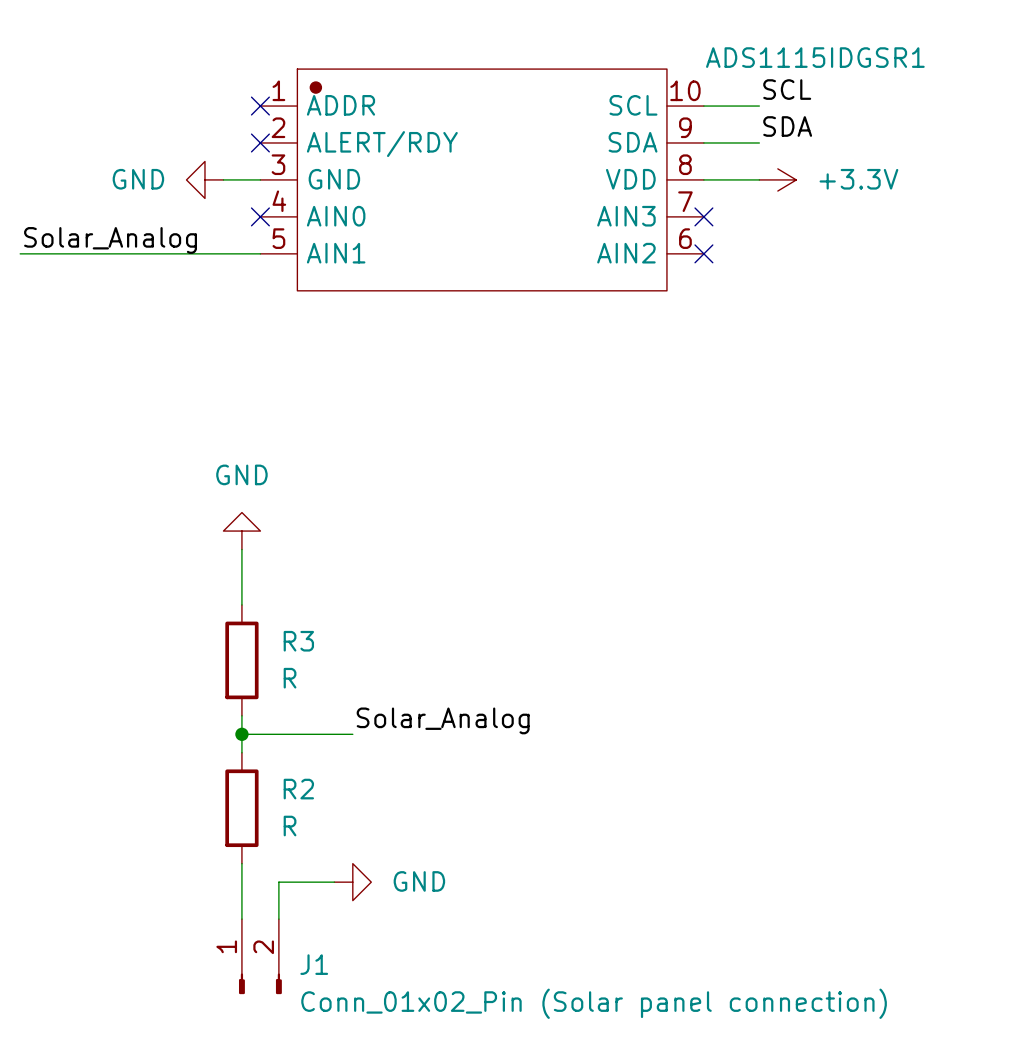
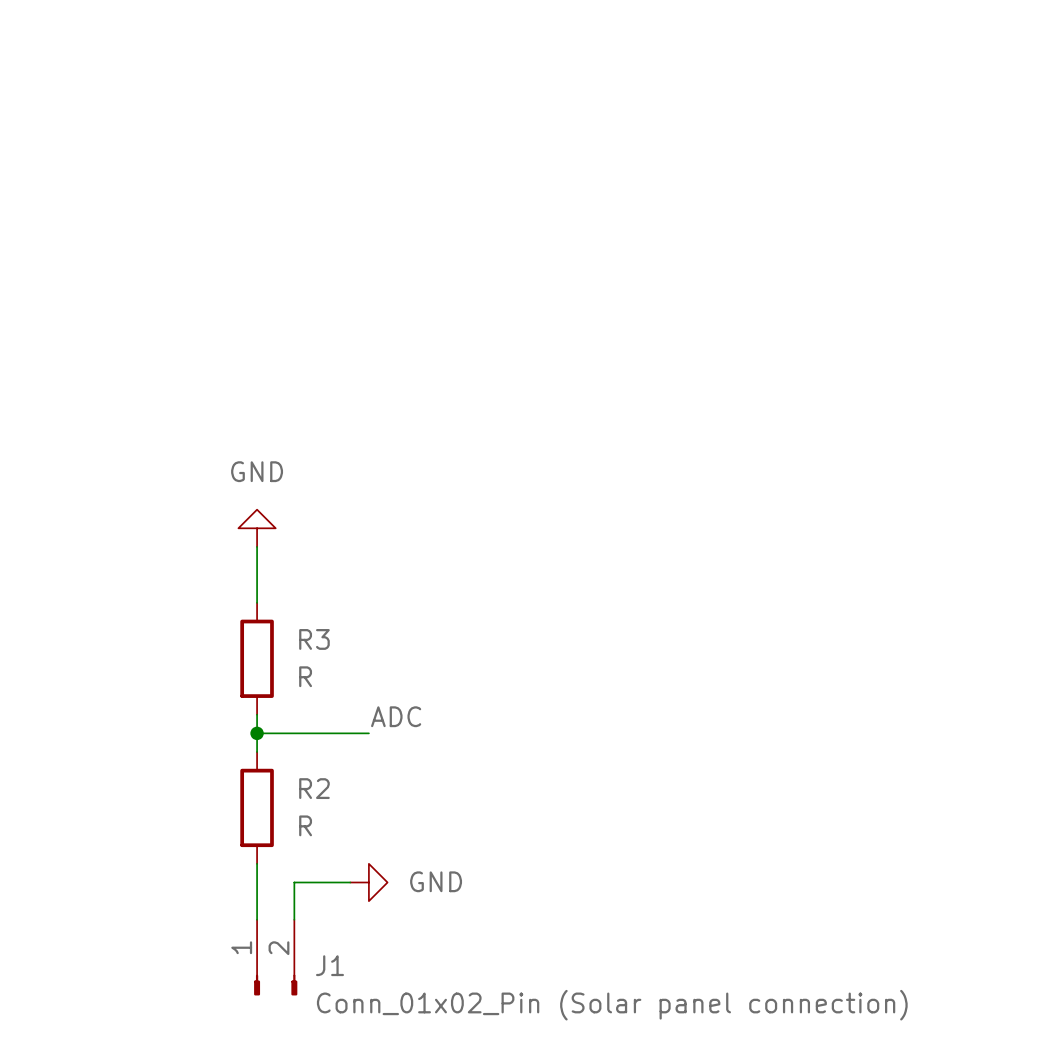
label: SCL (787, 89) -> none
no-connect mark: (260, 106) -> none
wire: (703, 106) (759, 106) -> none
label: SDA (787, 126) -> none
no-connect mark: (260, 142) -> none
wire: (703, 142) (759, 142) -> none
power symbol: GND (204, 179) -> none
wire: (223, 179) (260, 179) -> none
ADS1115IDGSR1: (482, 179) -> none
wire: (703, 179) (759, 179) -> none
power symbol: +3.3V (777, 179) -> none
no-connect mark: (260, 216) -> none
no-connect mark: (703, 216) -> none
label: Solar_Analog (110, 240) -> none
wire: (20, 253) (260, 253) -> none
no-connect mark: (703, 253) -> none
label: Solar_Analog (443, 720) -> ADC (396, 716)

